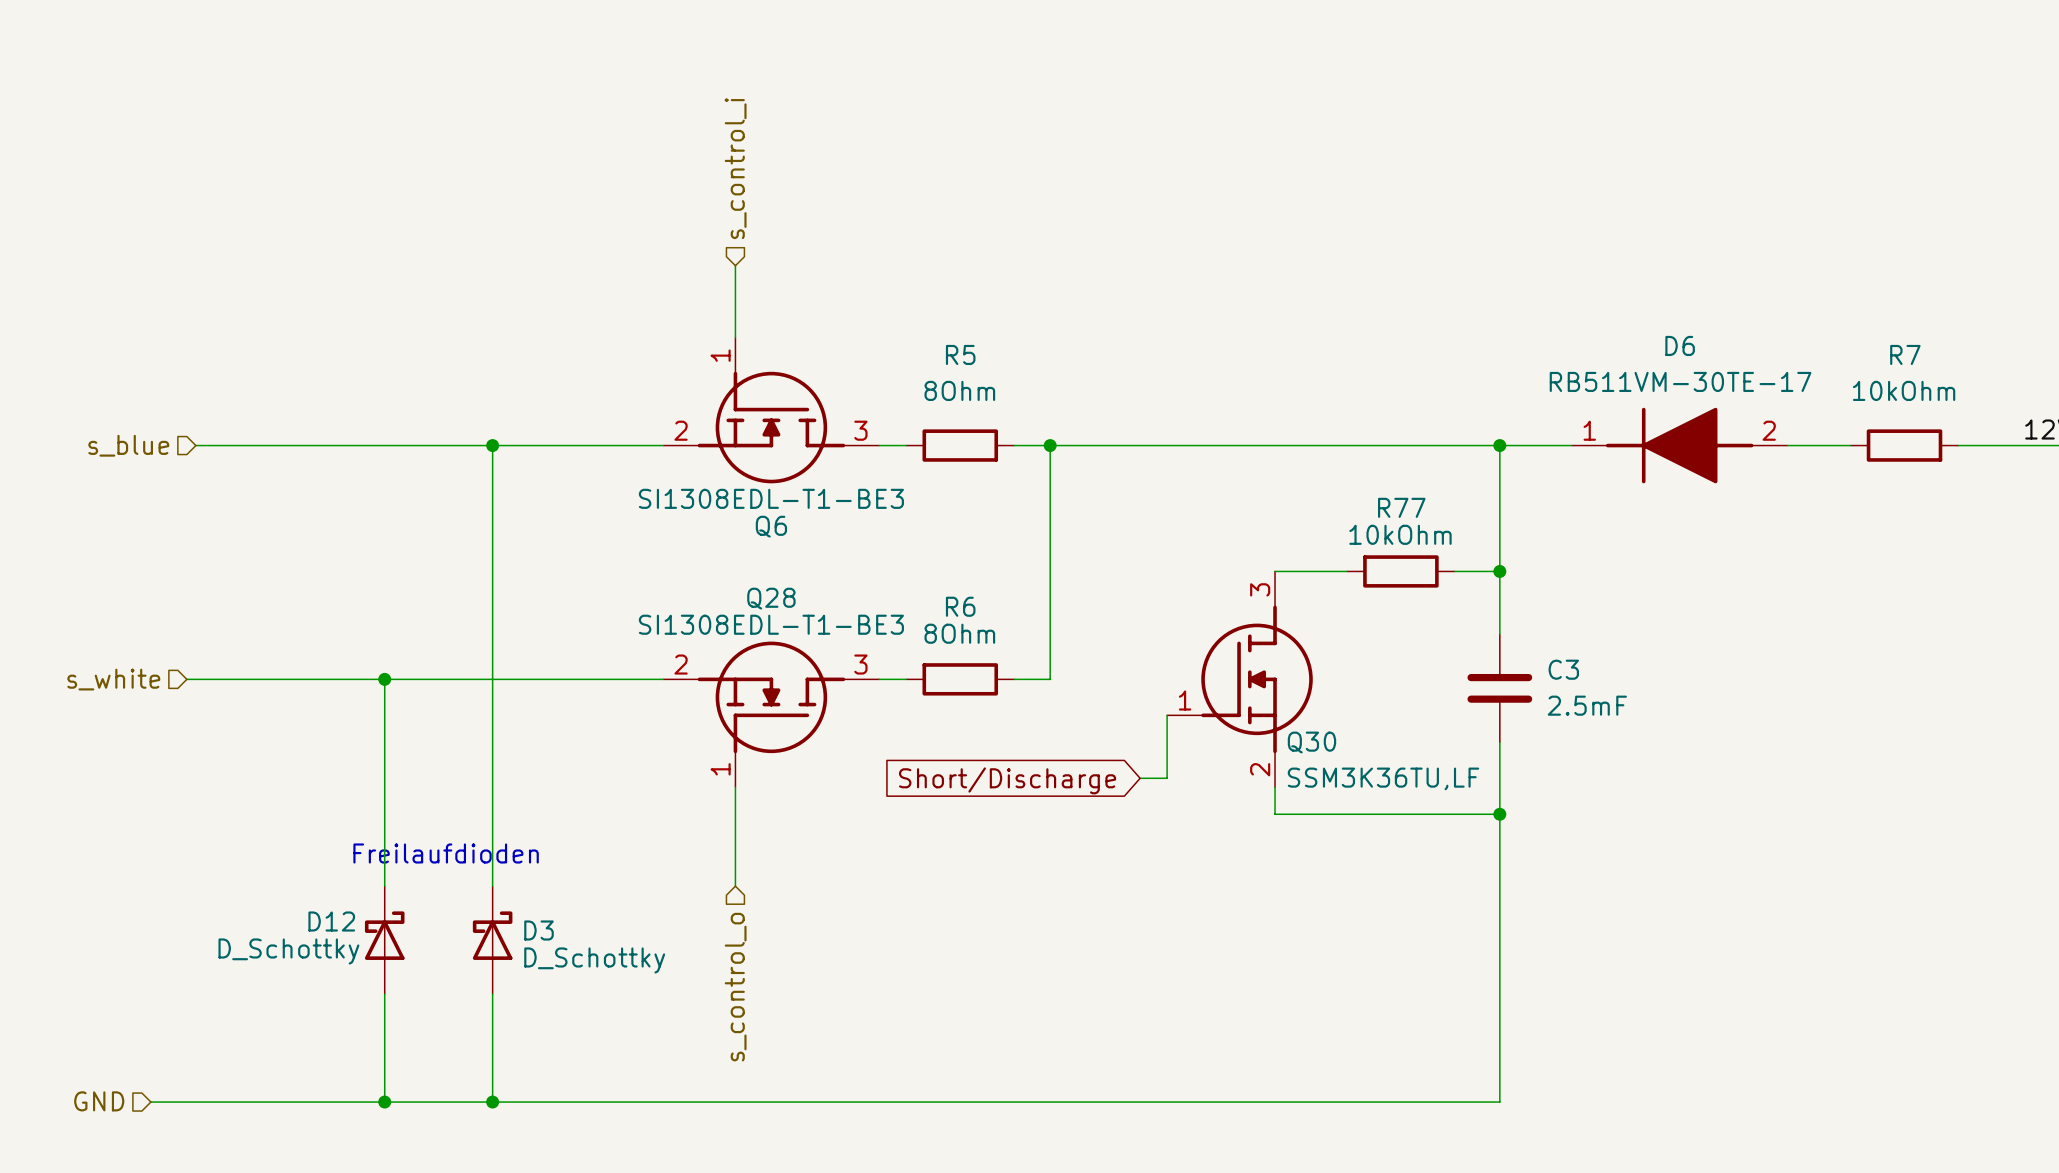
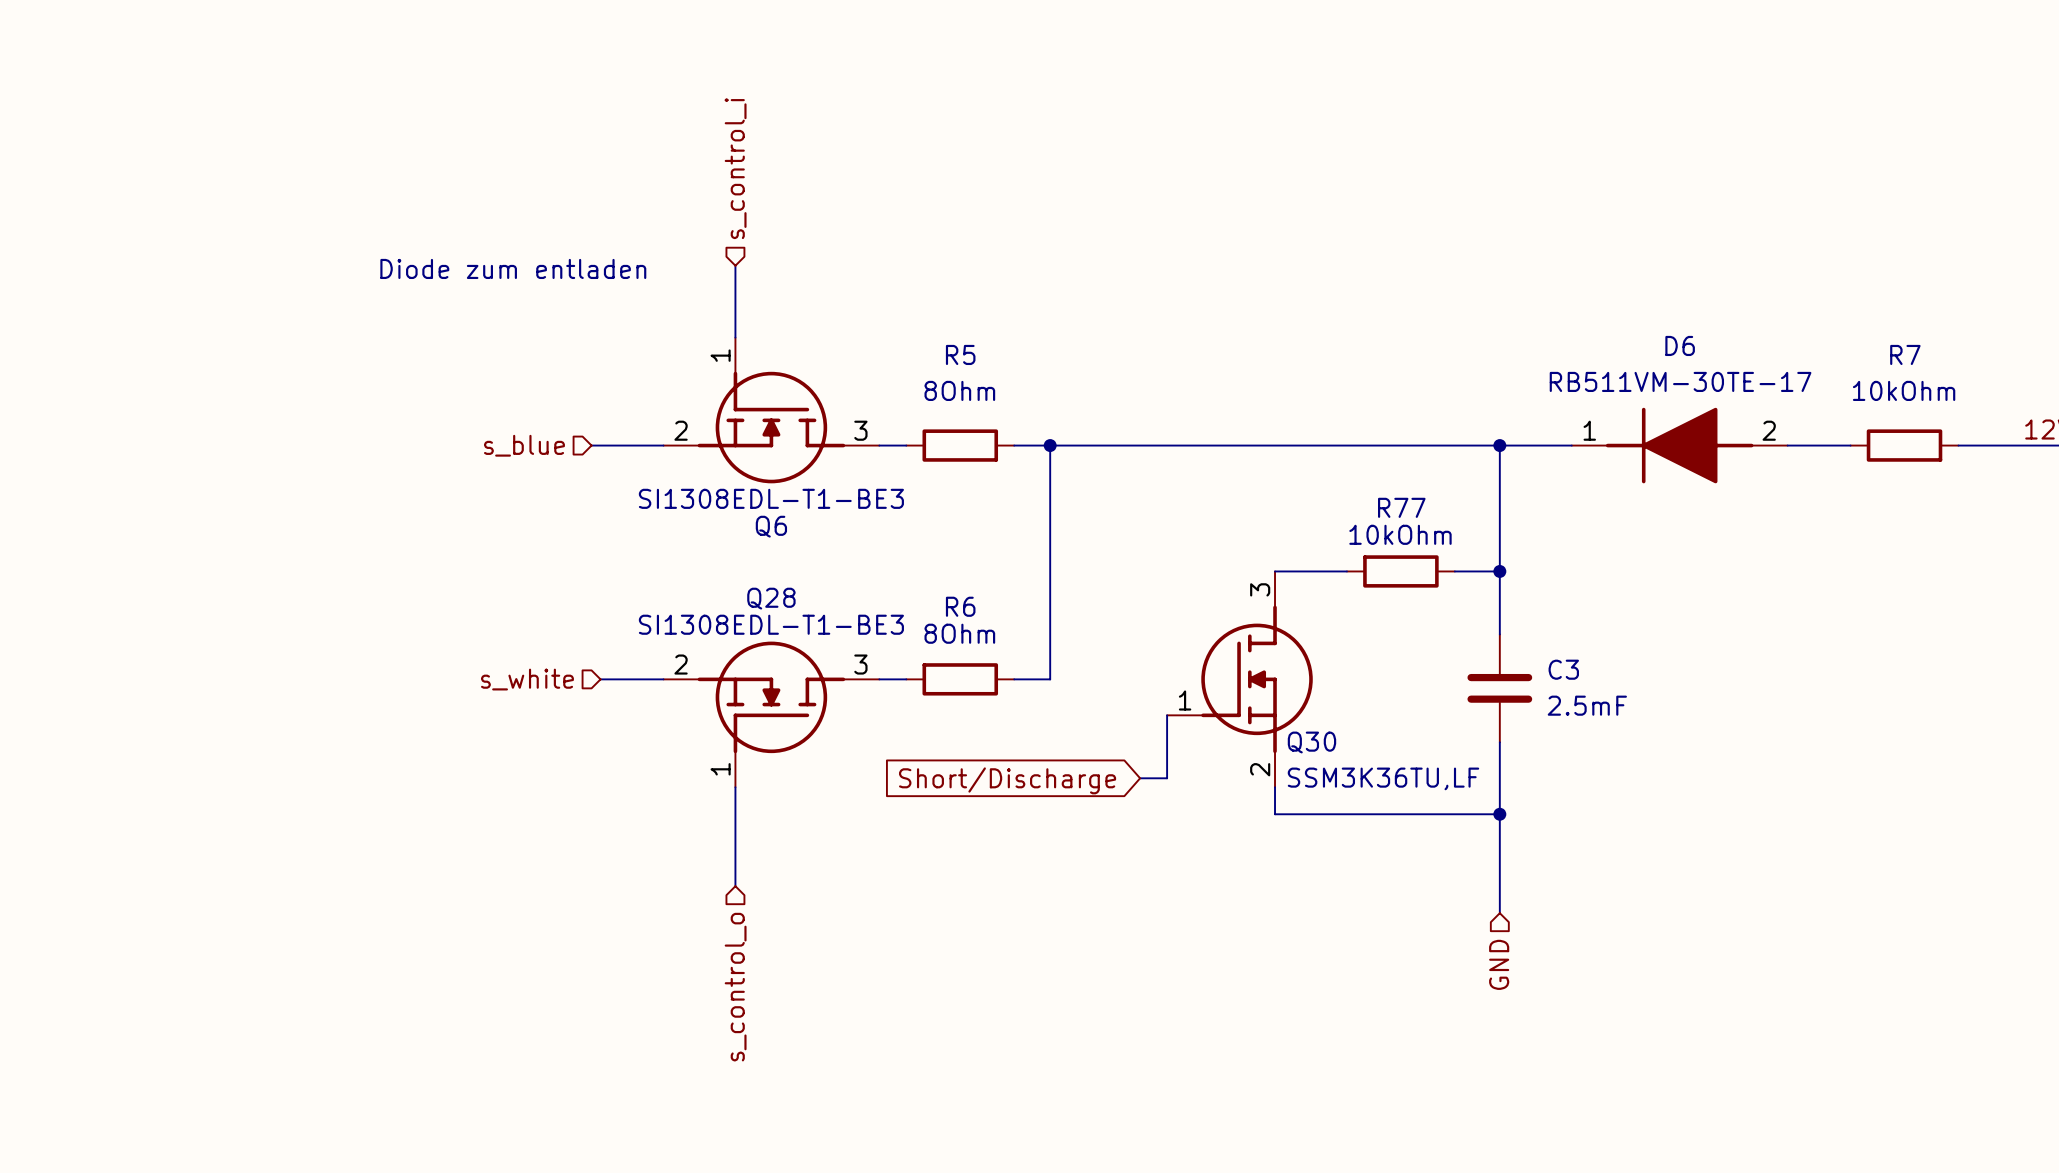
text: none -> Diode zum entladen (513, 268)
hierarchical label: s_blue (128, 445) -> none
wire: (195, 445) (591, 445) -> none
wire: (492, 445) (492, 886) -> none
junction: (492, 445) -> none
hierarchical label: none -> s_blue (524, 445)
hierarchical label: s_white (113, 679) -> none
wire: (186, 679) (600, 679) -> none
wire: (384, 679) (384, 886) -> none
junction: (384, 679) -> none
hierarchical label: none -> s_white (527, 679)
text: Freilaufdioden (446, 853) -> none
wire: (1499, 913) (1499, 1102) (150, 1102) -> none
D12: D_Schottky (384, 940) -> none
D3: D_Schottky (492, 940) -> none
hierarchical label: none -> GND (1499, 964)
wire: (384, 994) (384, 1102) -> none
wire: (492, 994) (492, 1102) -> none
hierarchical label: GND (99, 1101) -> none
junction: (384, 1102) -> none
junction: (492, 1102) -> none

